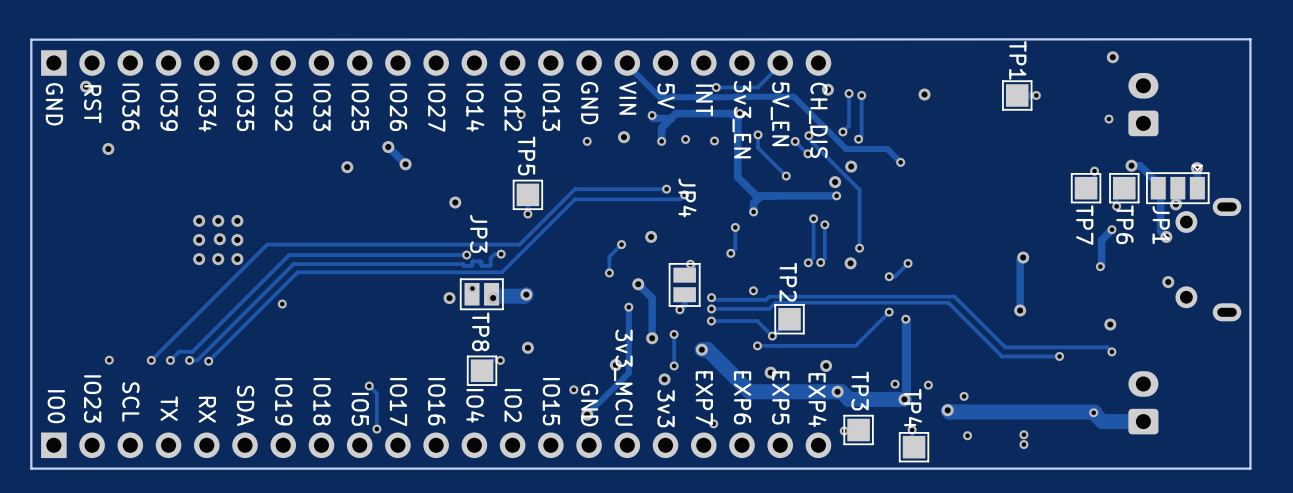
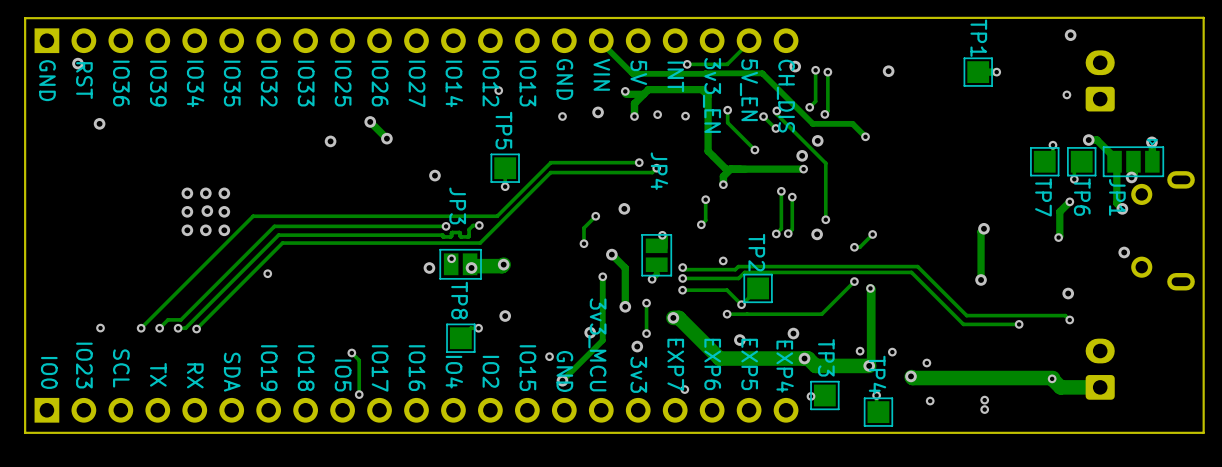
via: (739, 113) -> none

